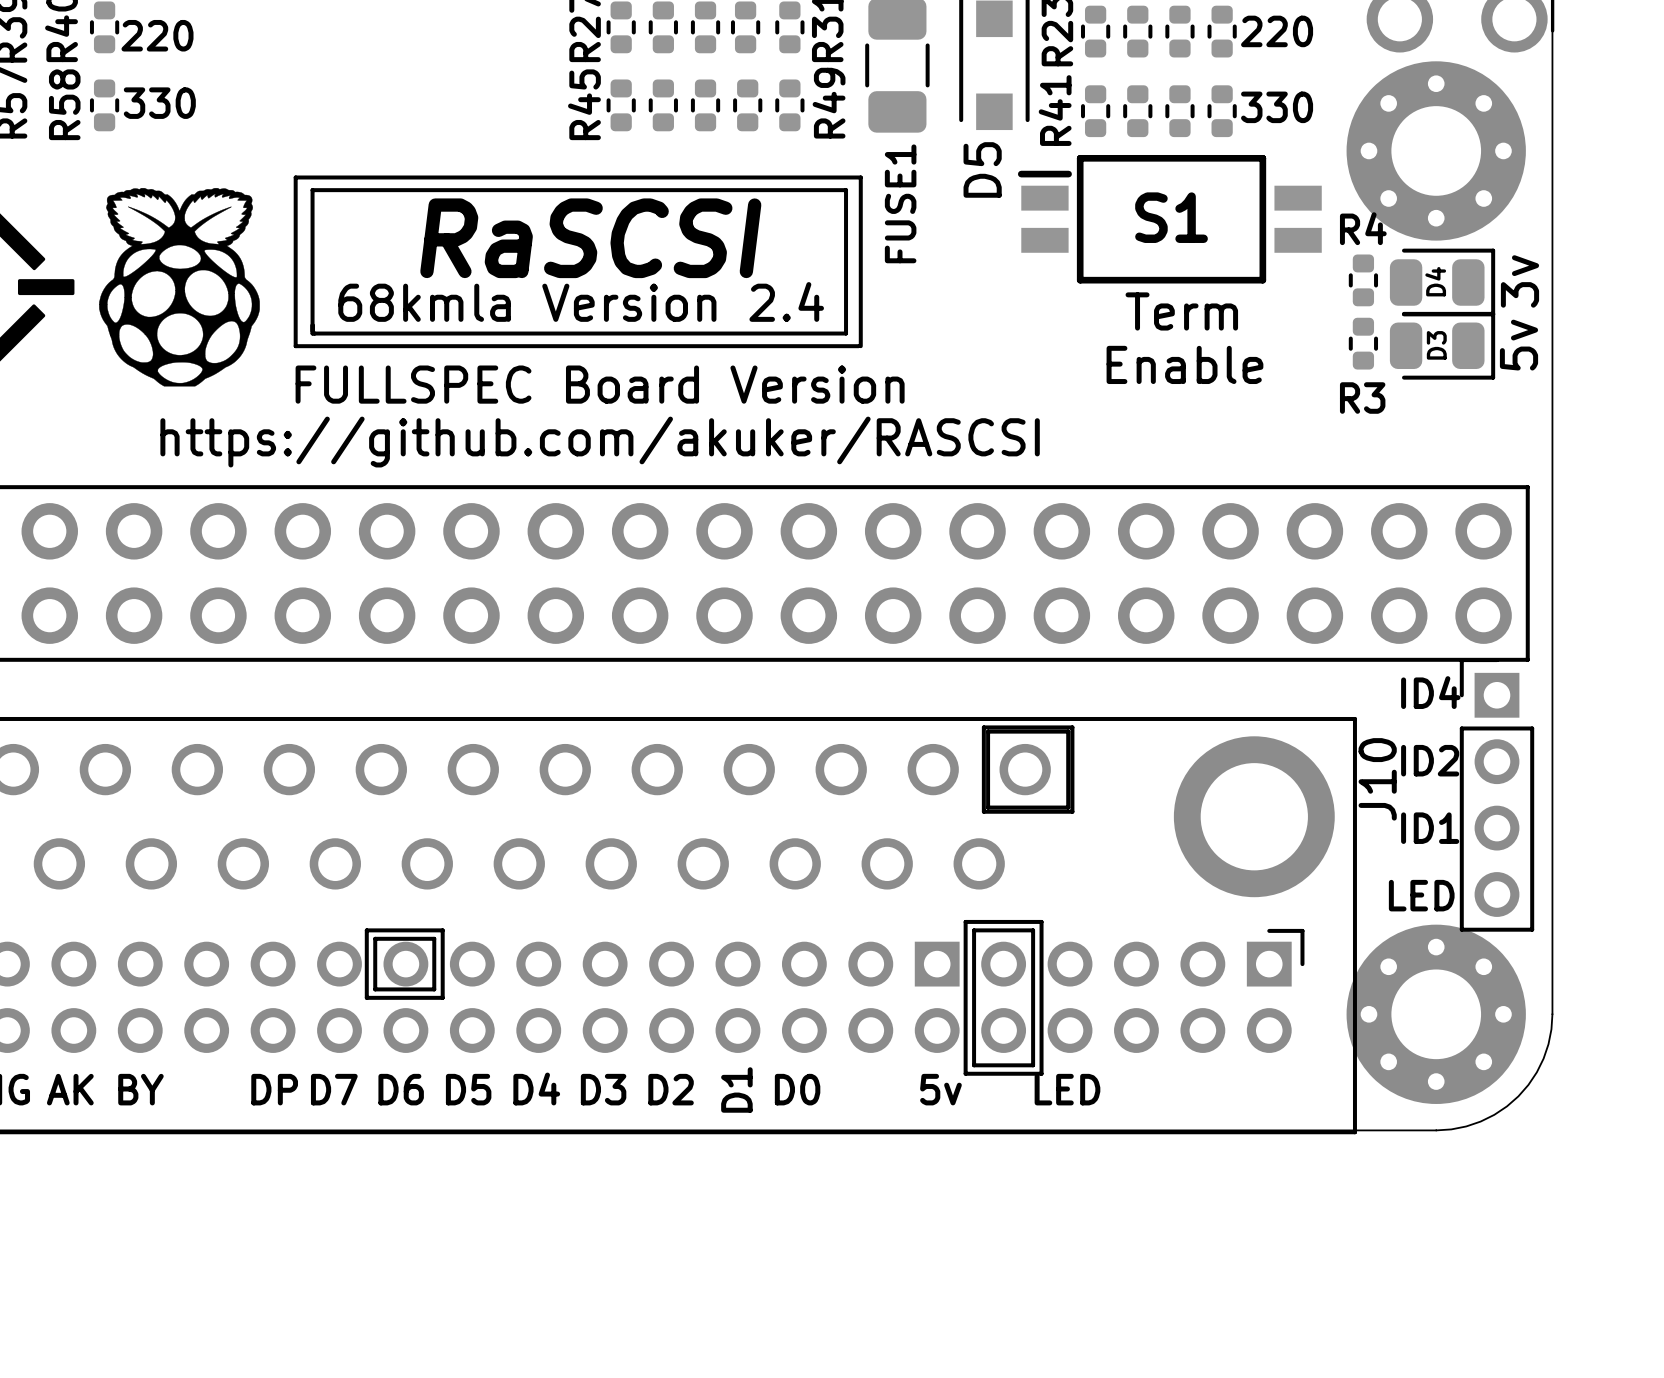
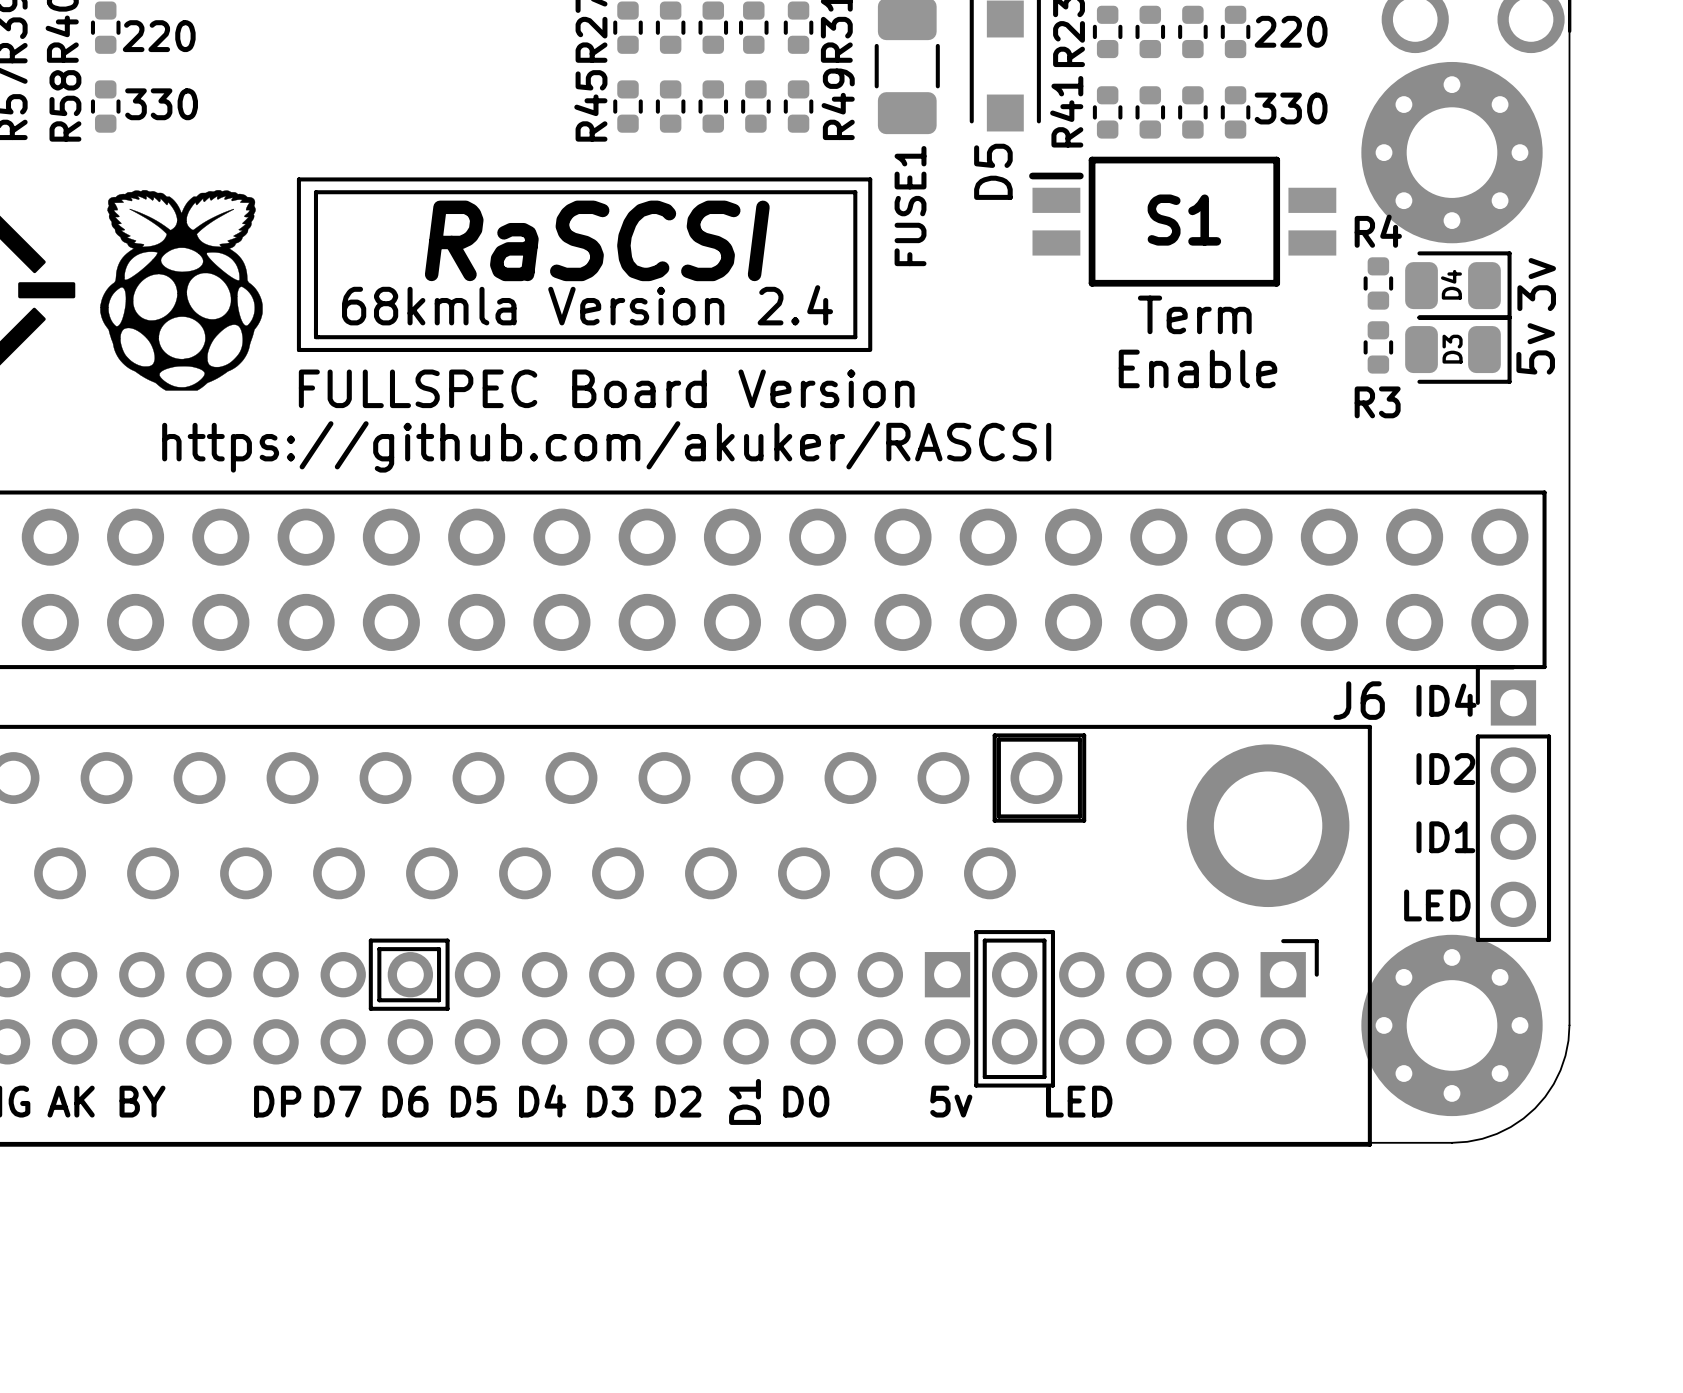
text: none -> J6 (1359, 700)
text: J10 (1377, 779) -> none

